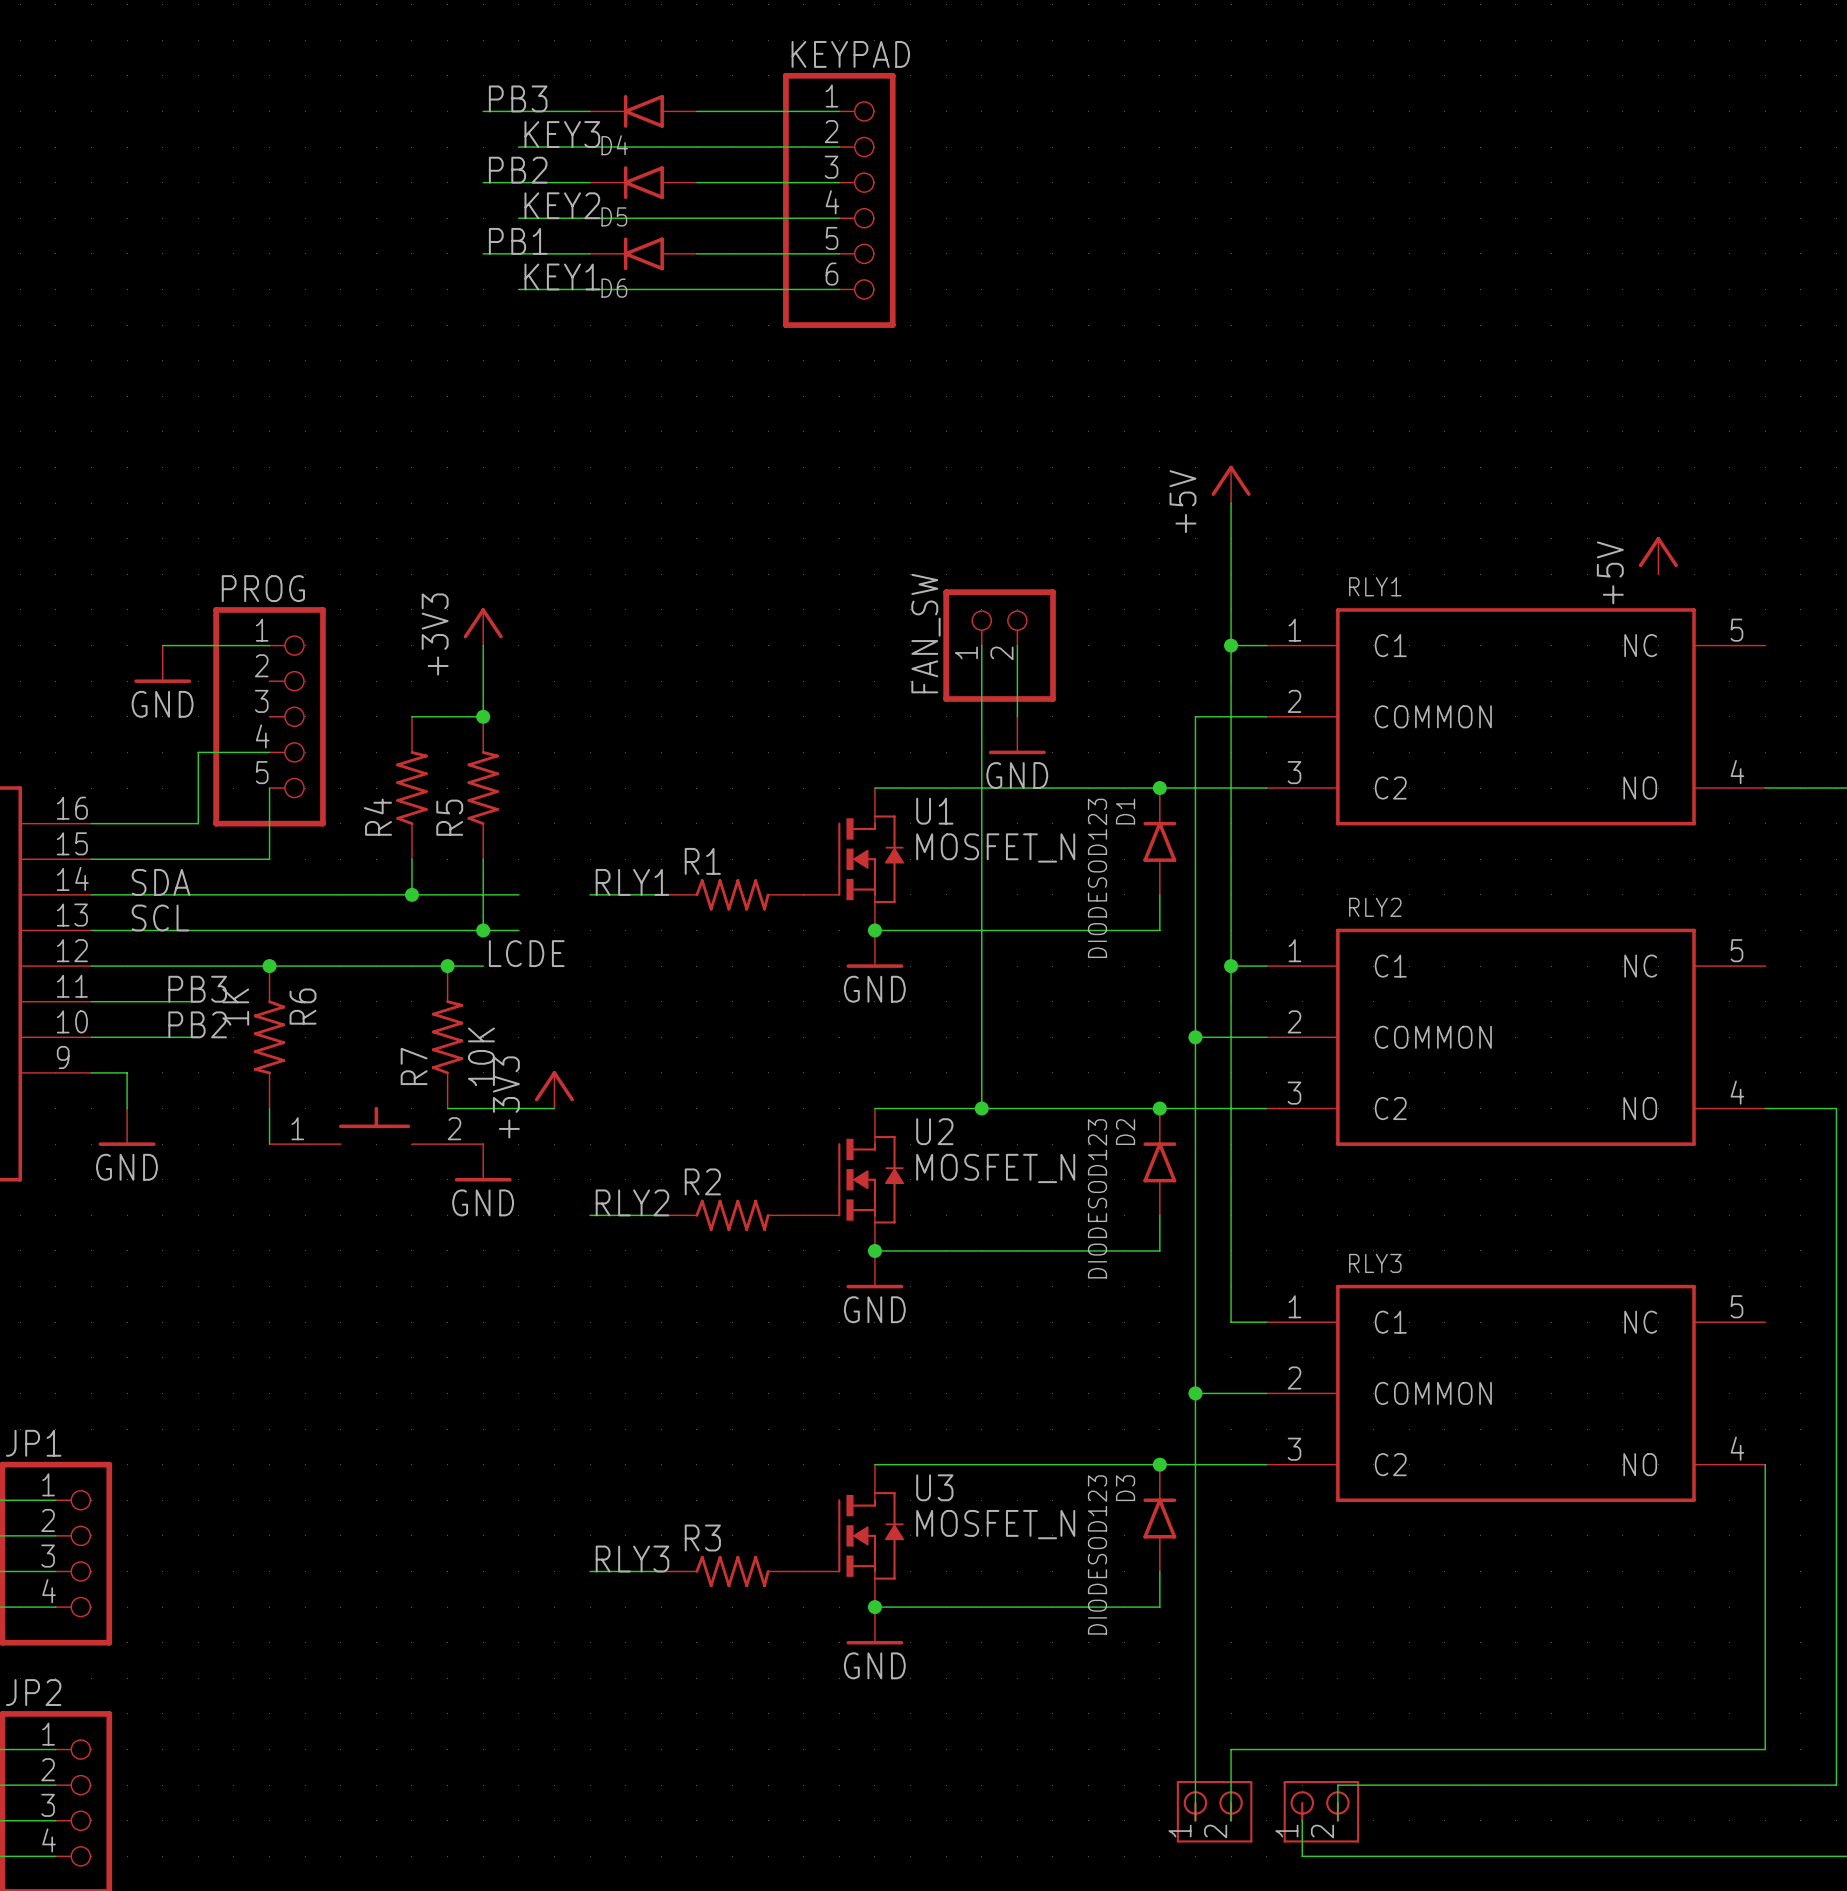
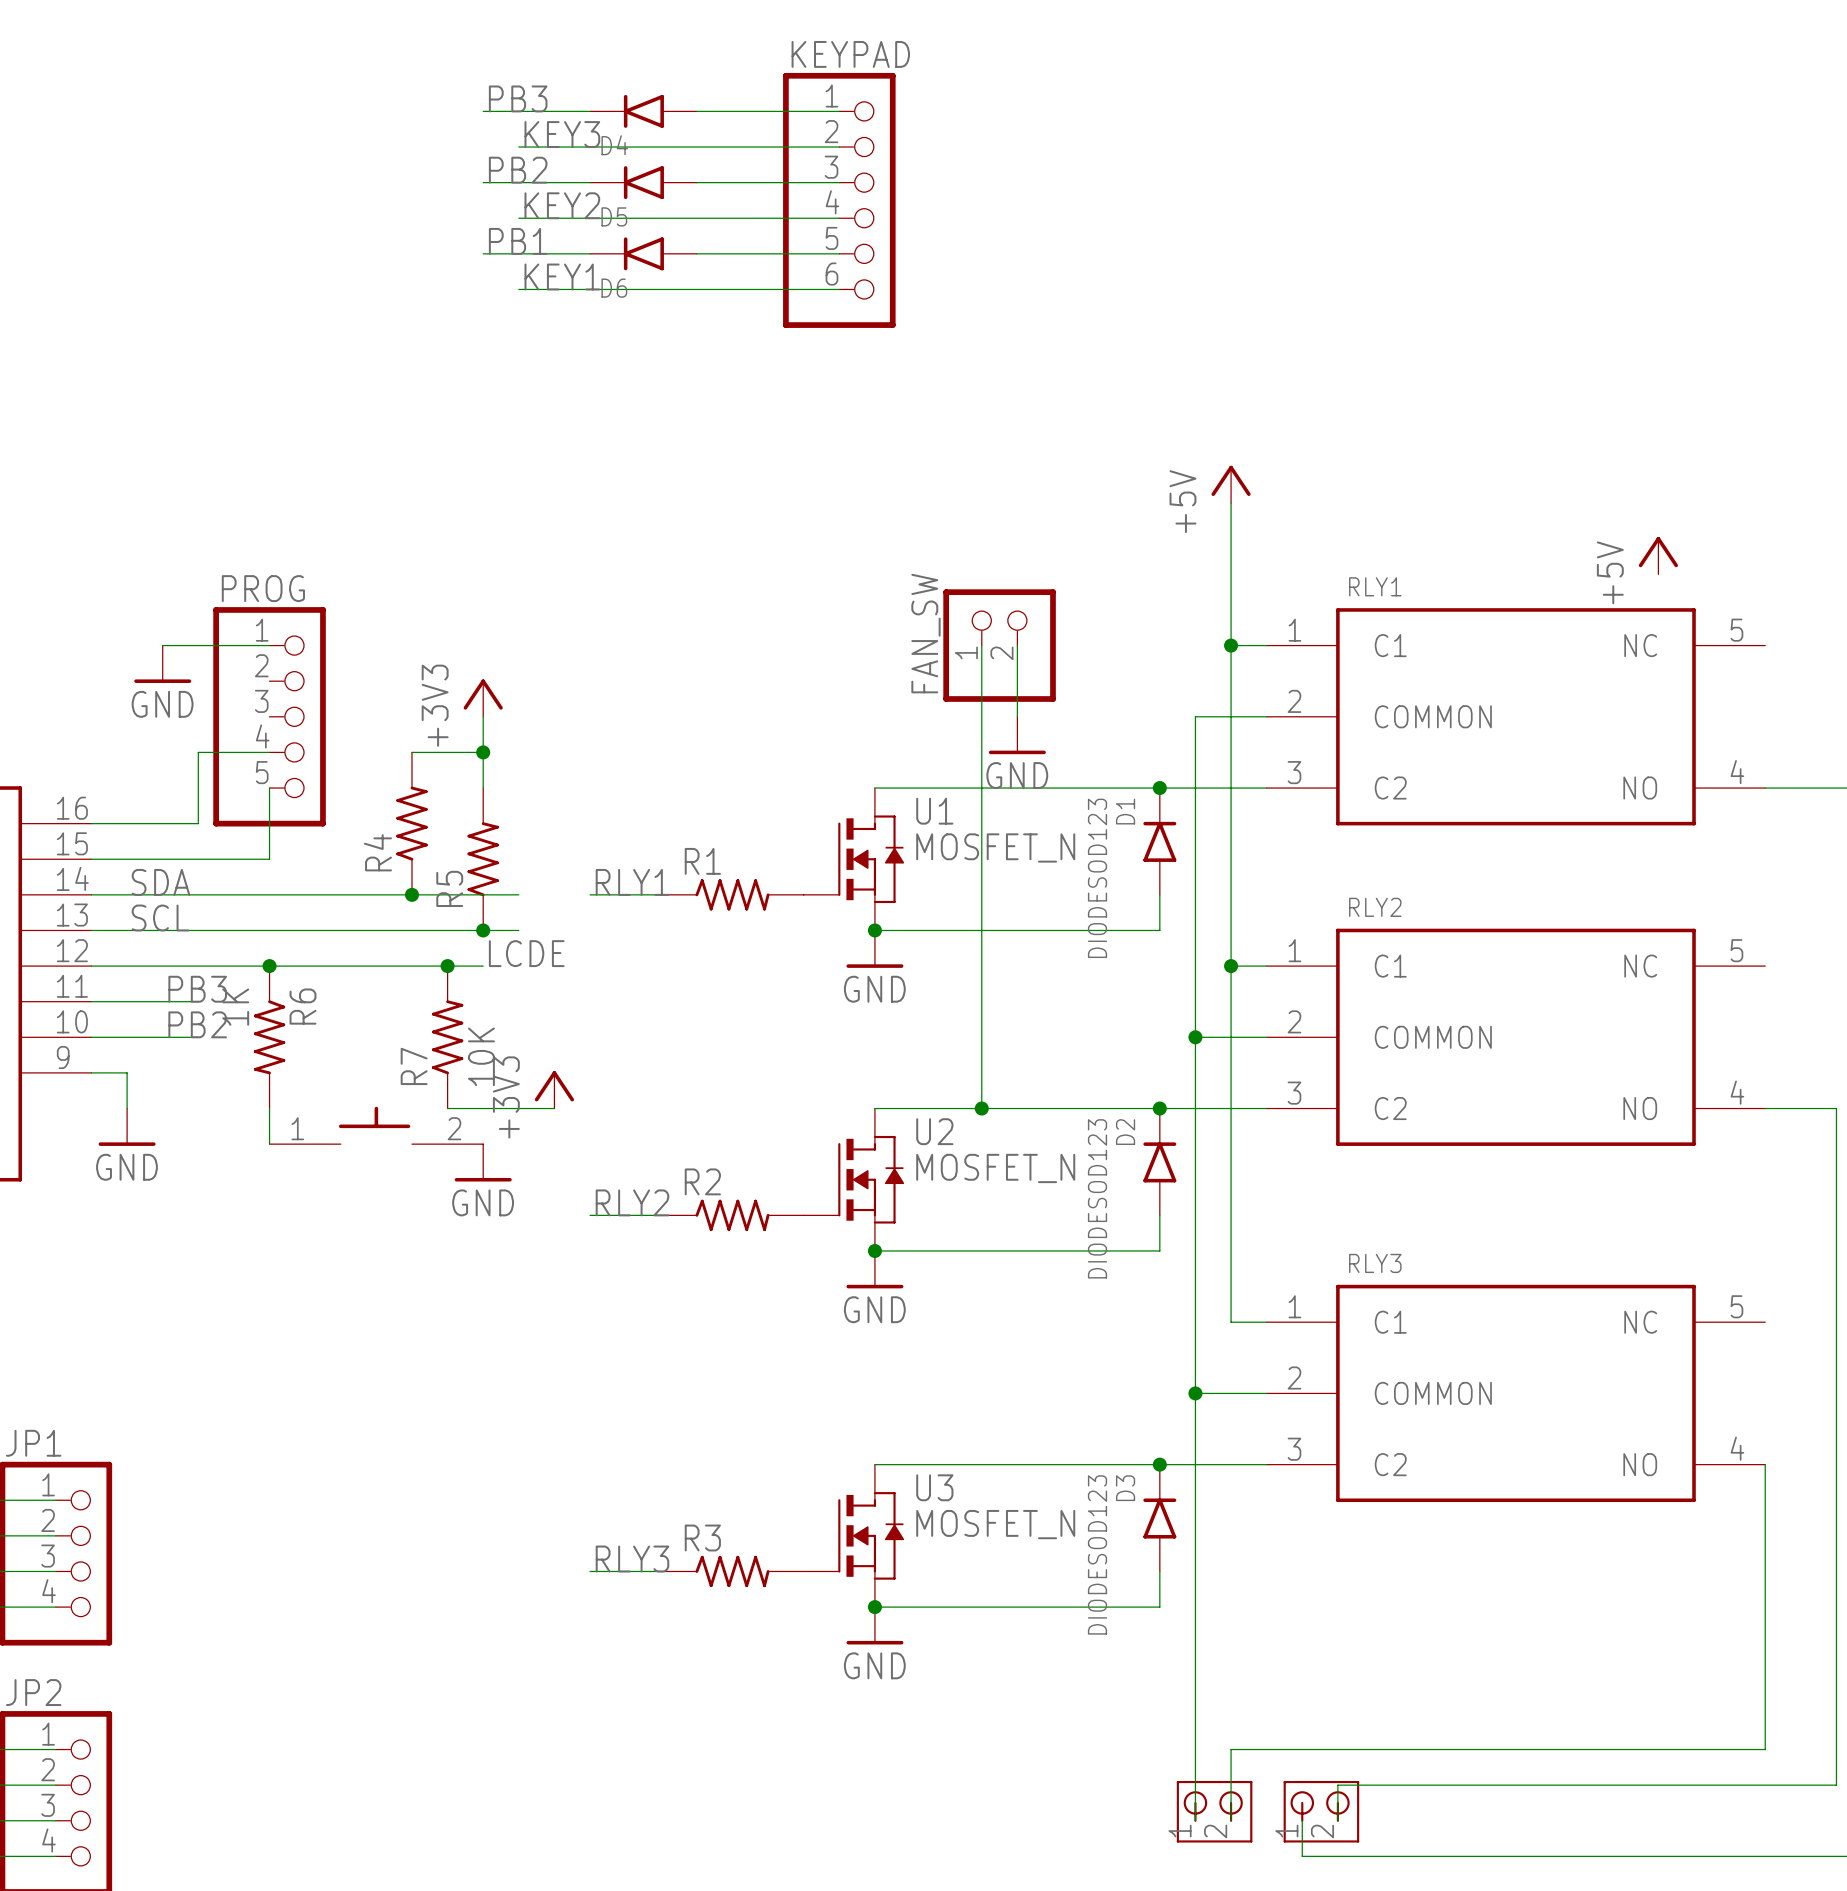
power symbol position: +3V3 (483, 626) -> +3V3 (483, 698)
wire: (483, 645) (483, 716) (411, 716) -> none
junction position: (483, 716) -> (483, 752)
wire: none -> (411, 752) (483, 752)
R4 position: (411, 788) -> (411, 823)
R5 position: (483, 788) -> (483, 859)

